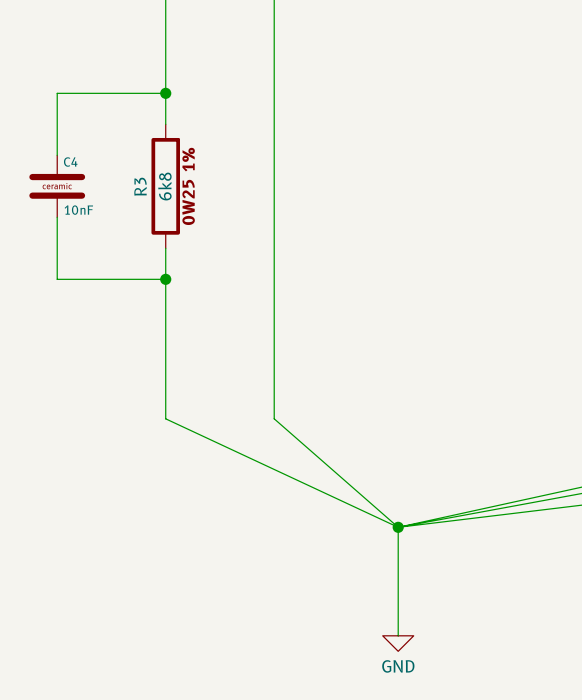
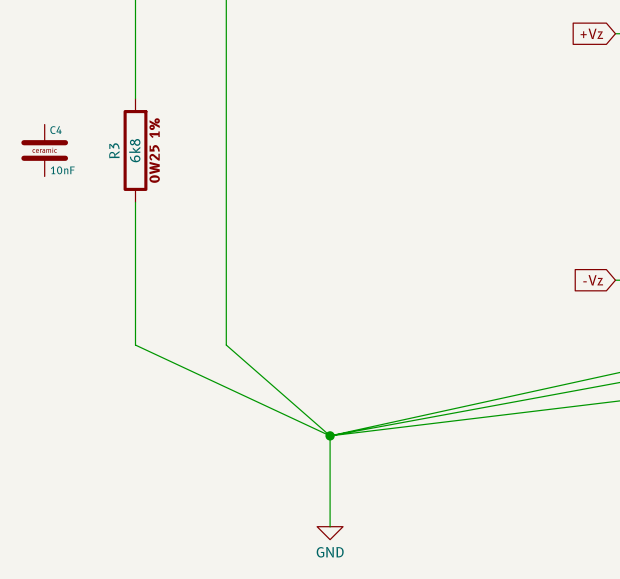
wire: (165, 93) (57, 93) (57, 155) -> none
junction: (165, 93) -> none
wire: (57, 217) (57, 279) (165, 279) -> none
junction: (165, 279) -> none

